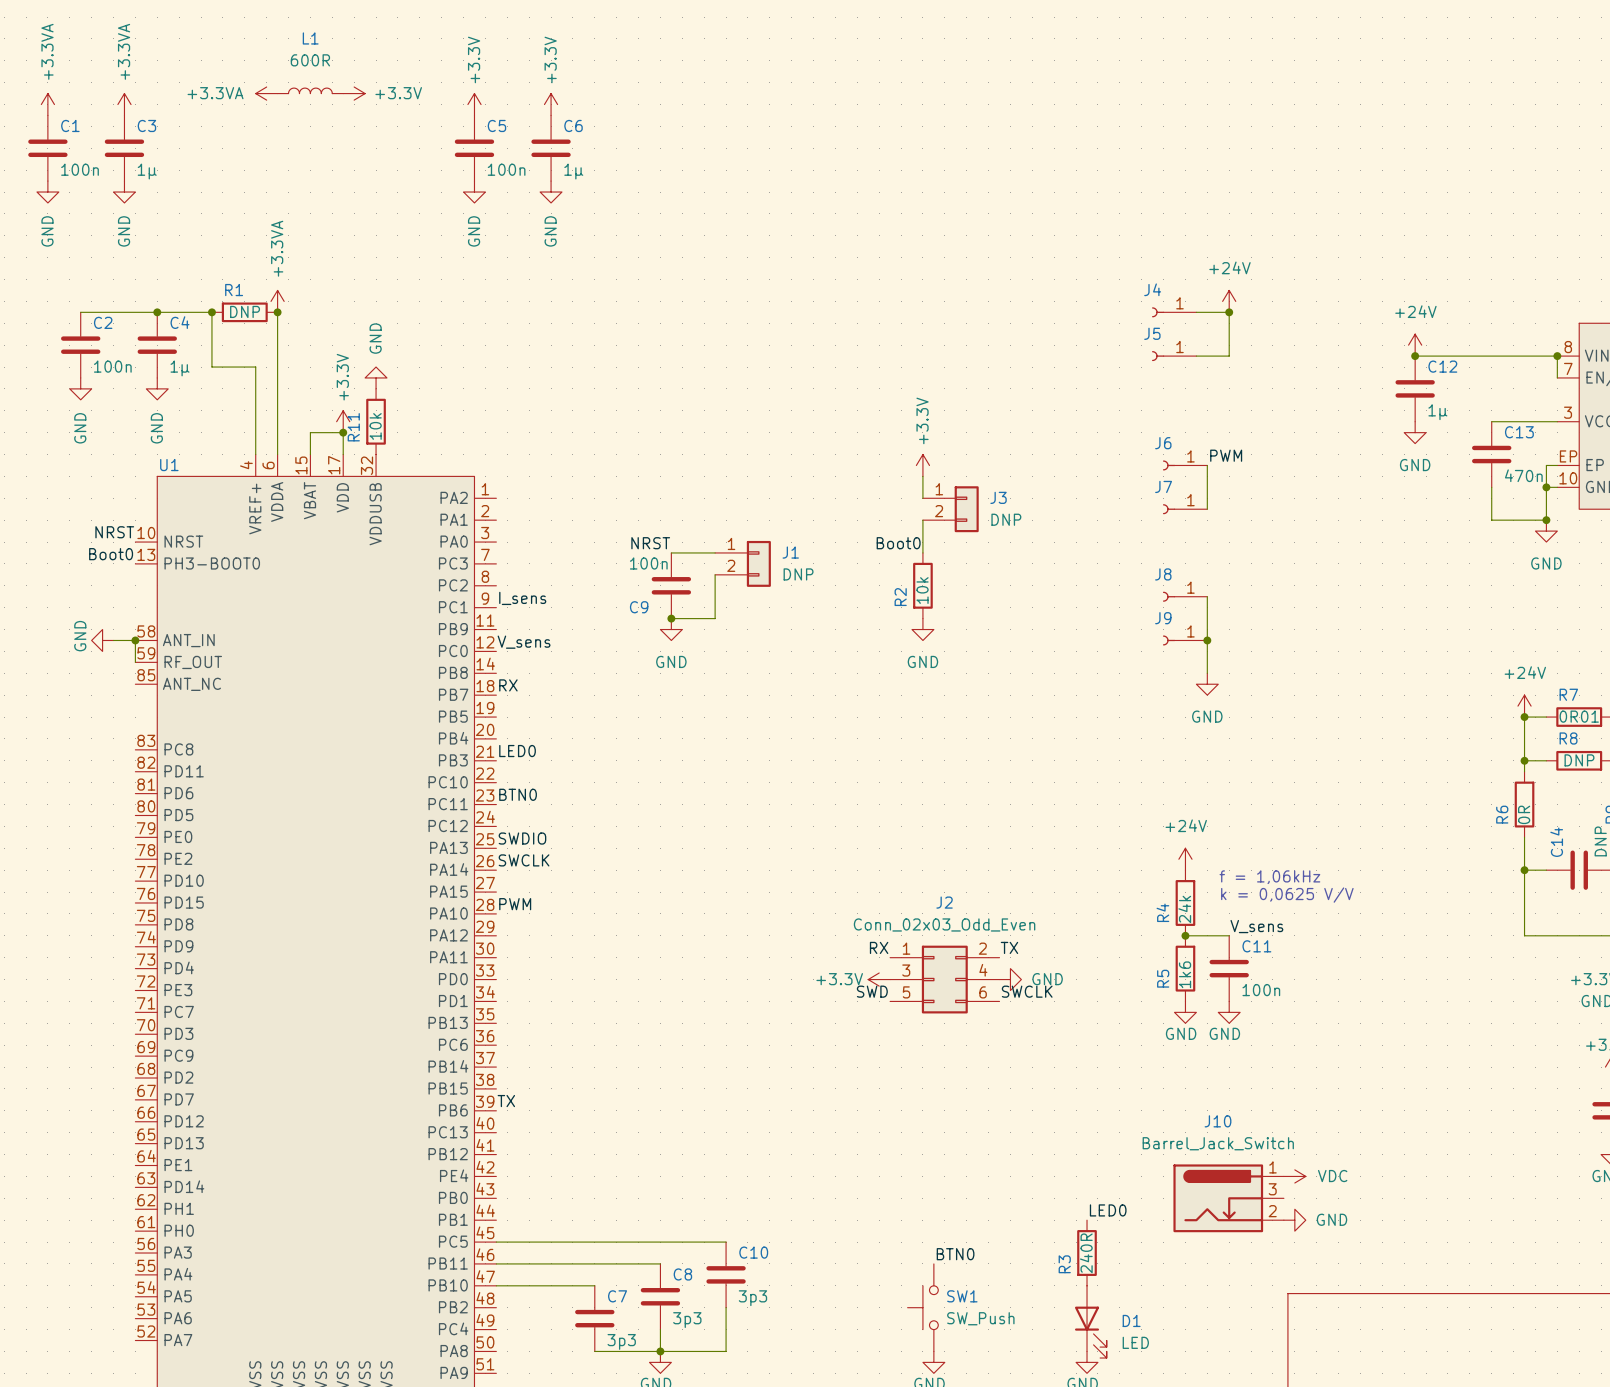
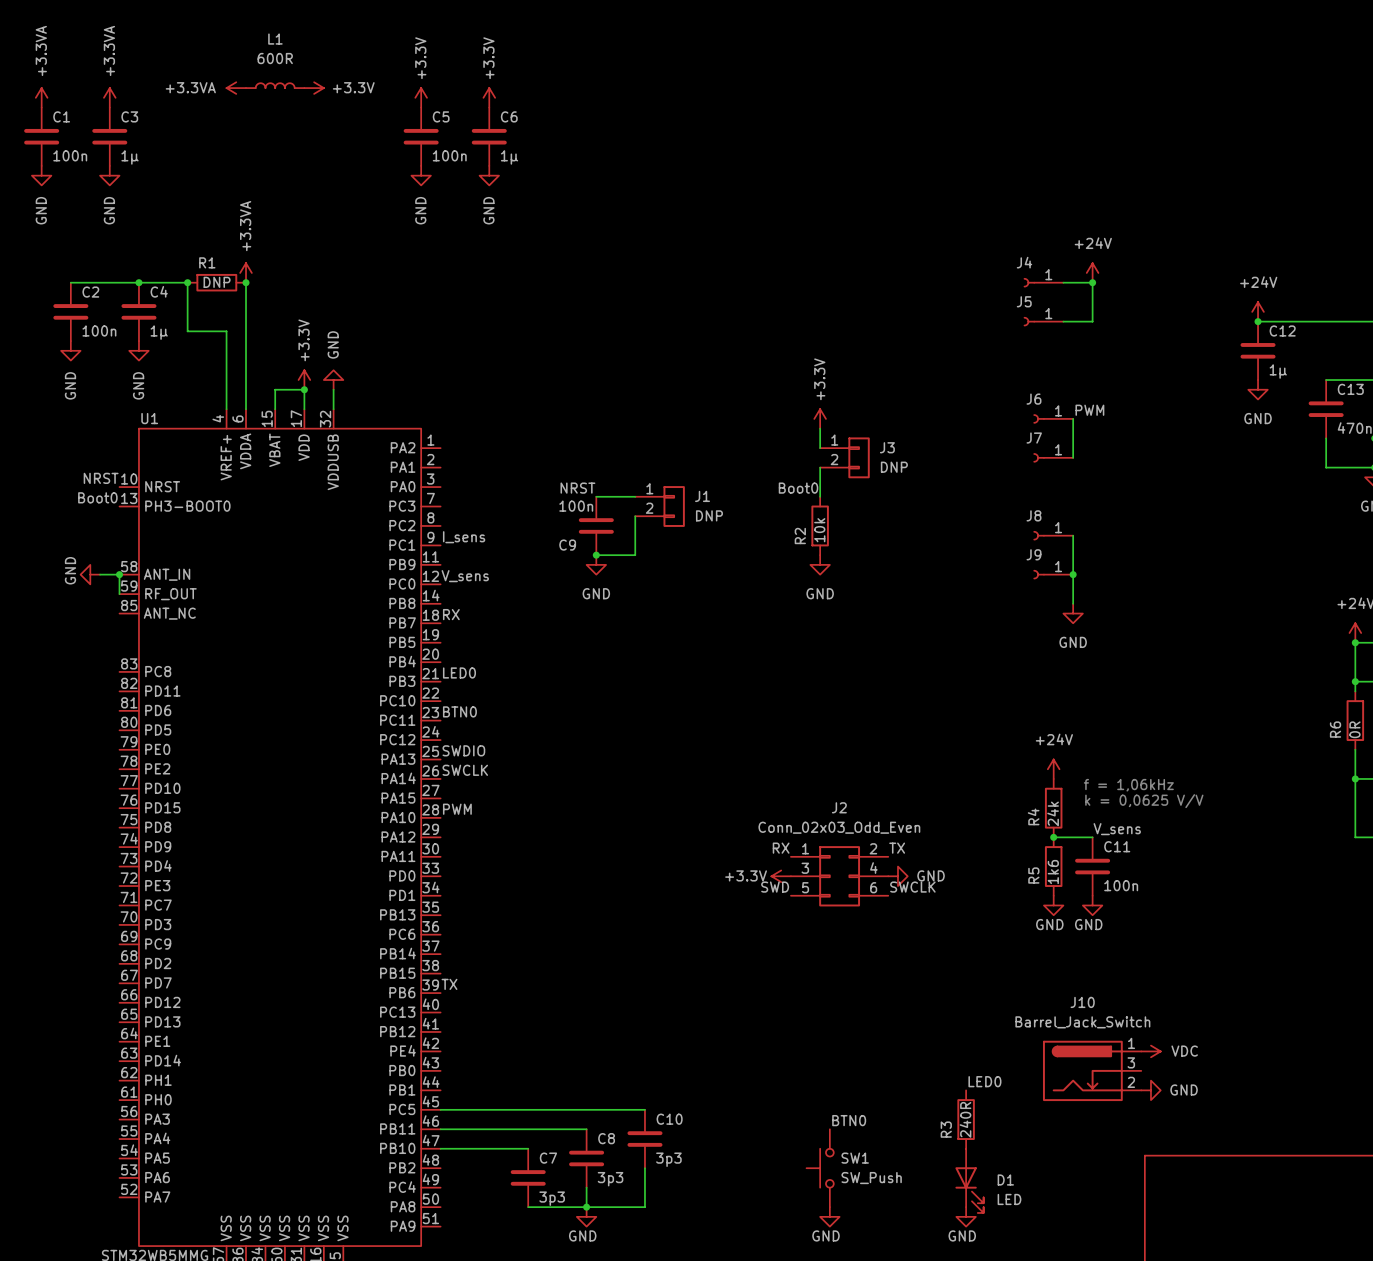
power symbol position: GND (376, 377) -> GND (333, 380)
R11: 10k (376, 421) -> none

